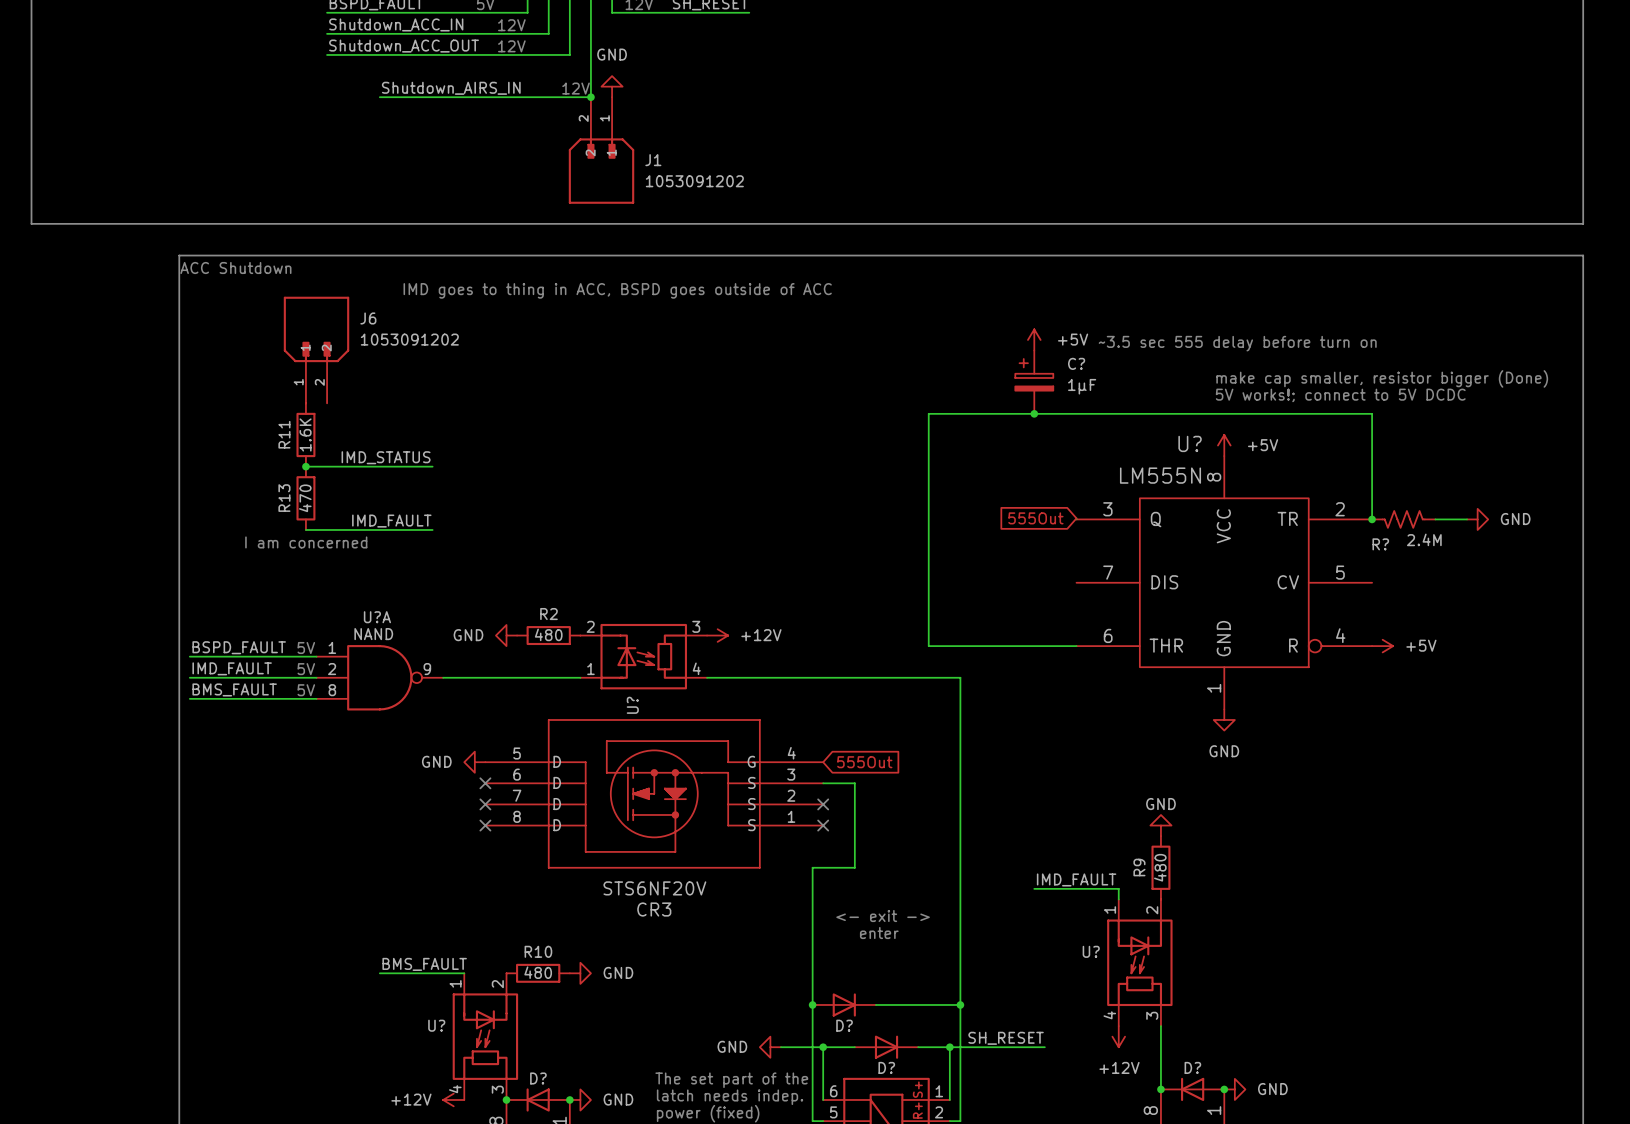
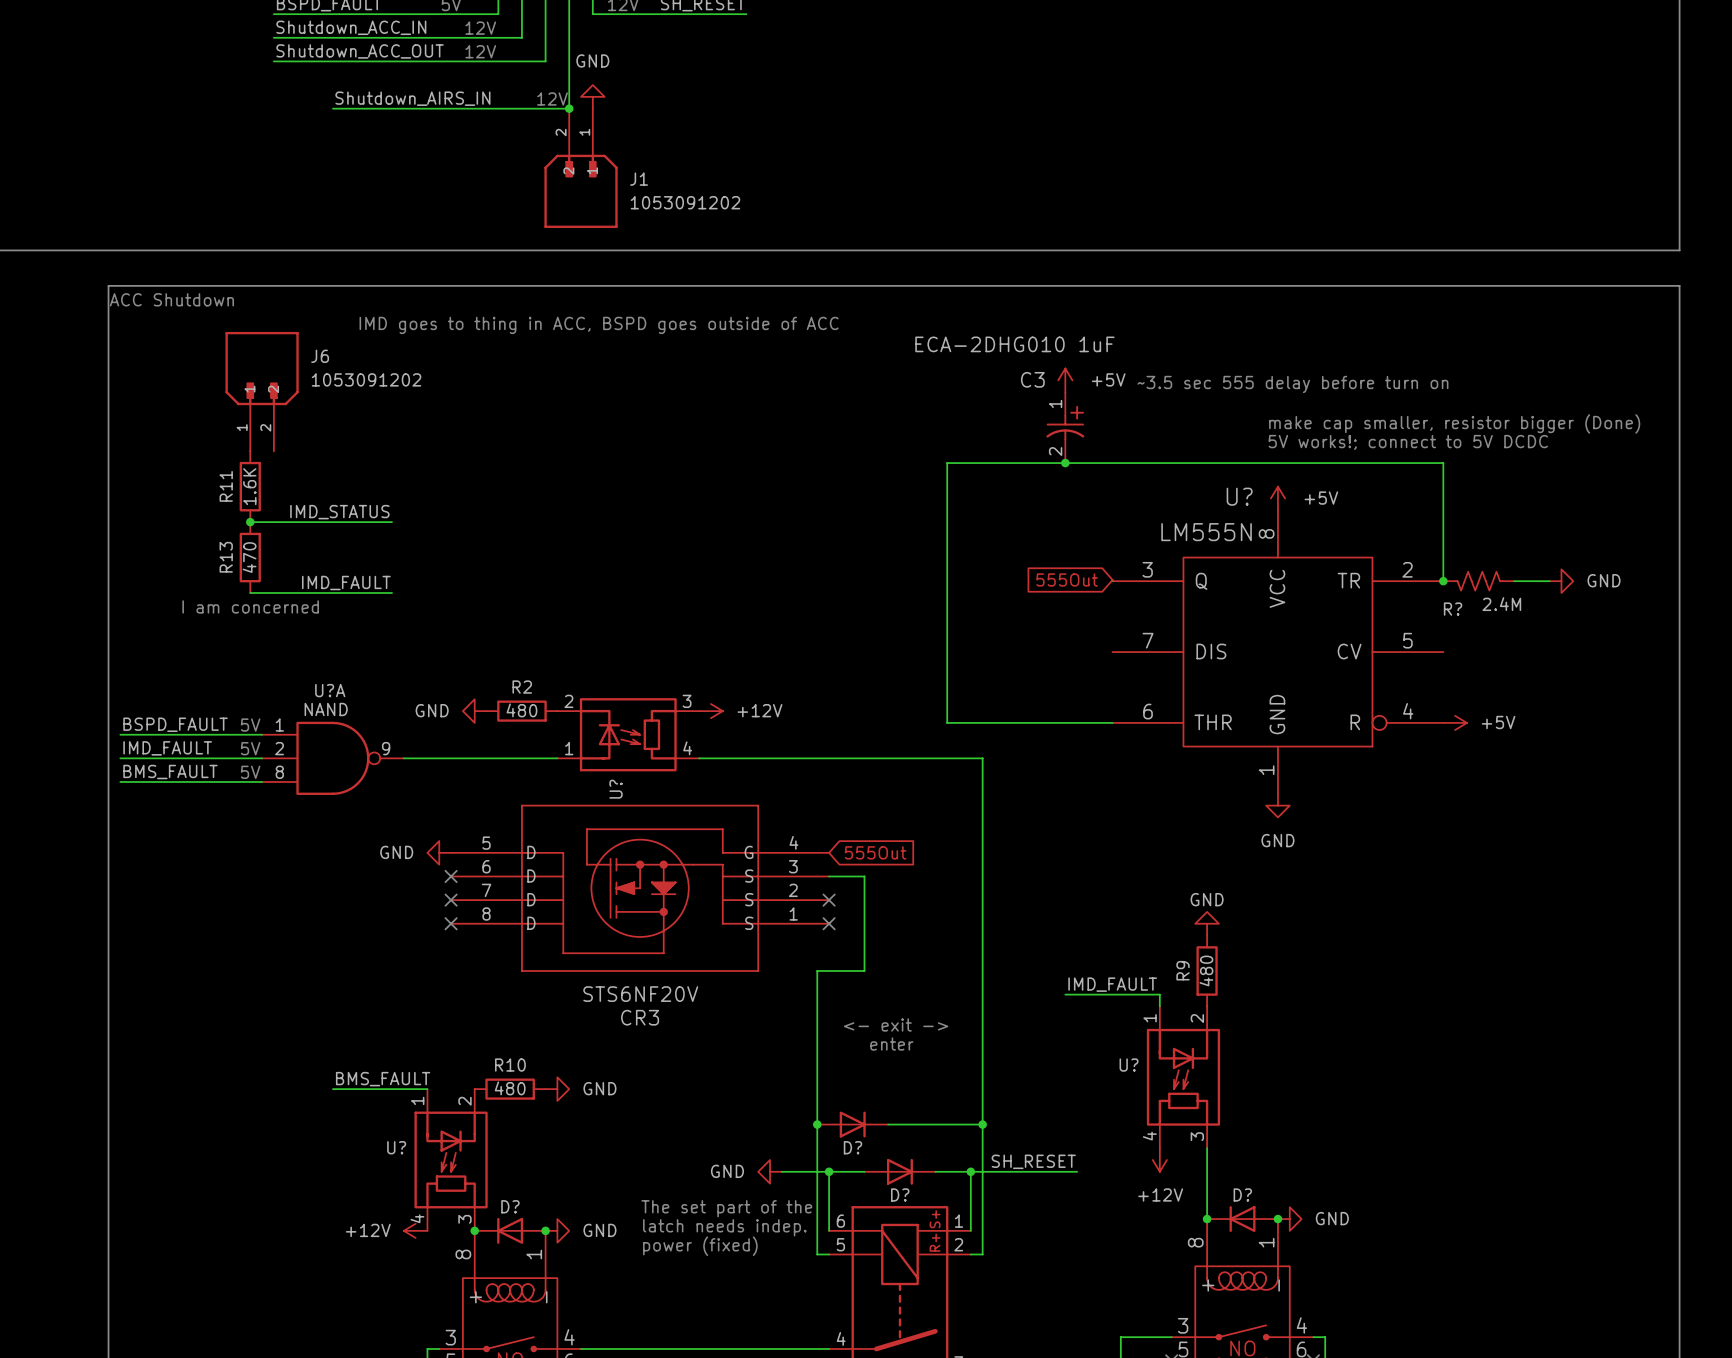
C?: 1µF (1034, 382) -> none
C3: none -> ECA-2DHG010 1uF (1065, 427)

